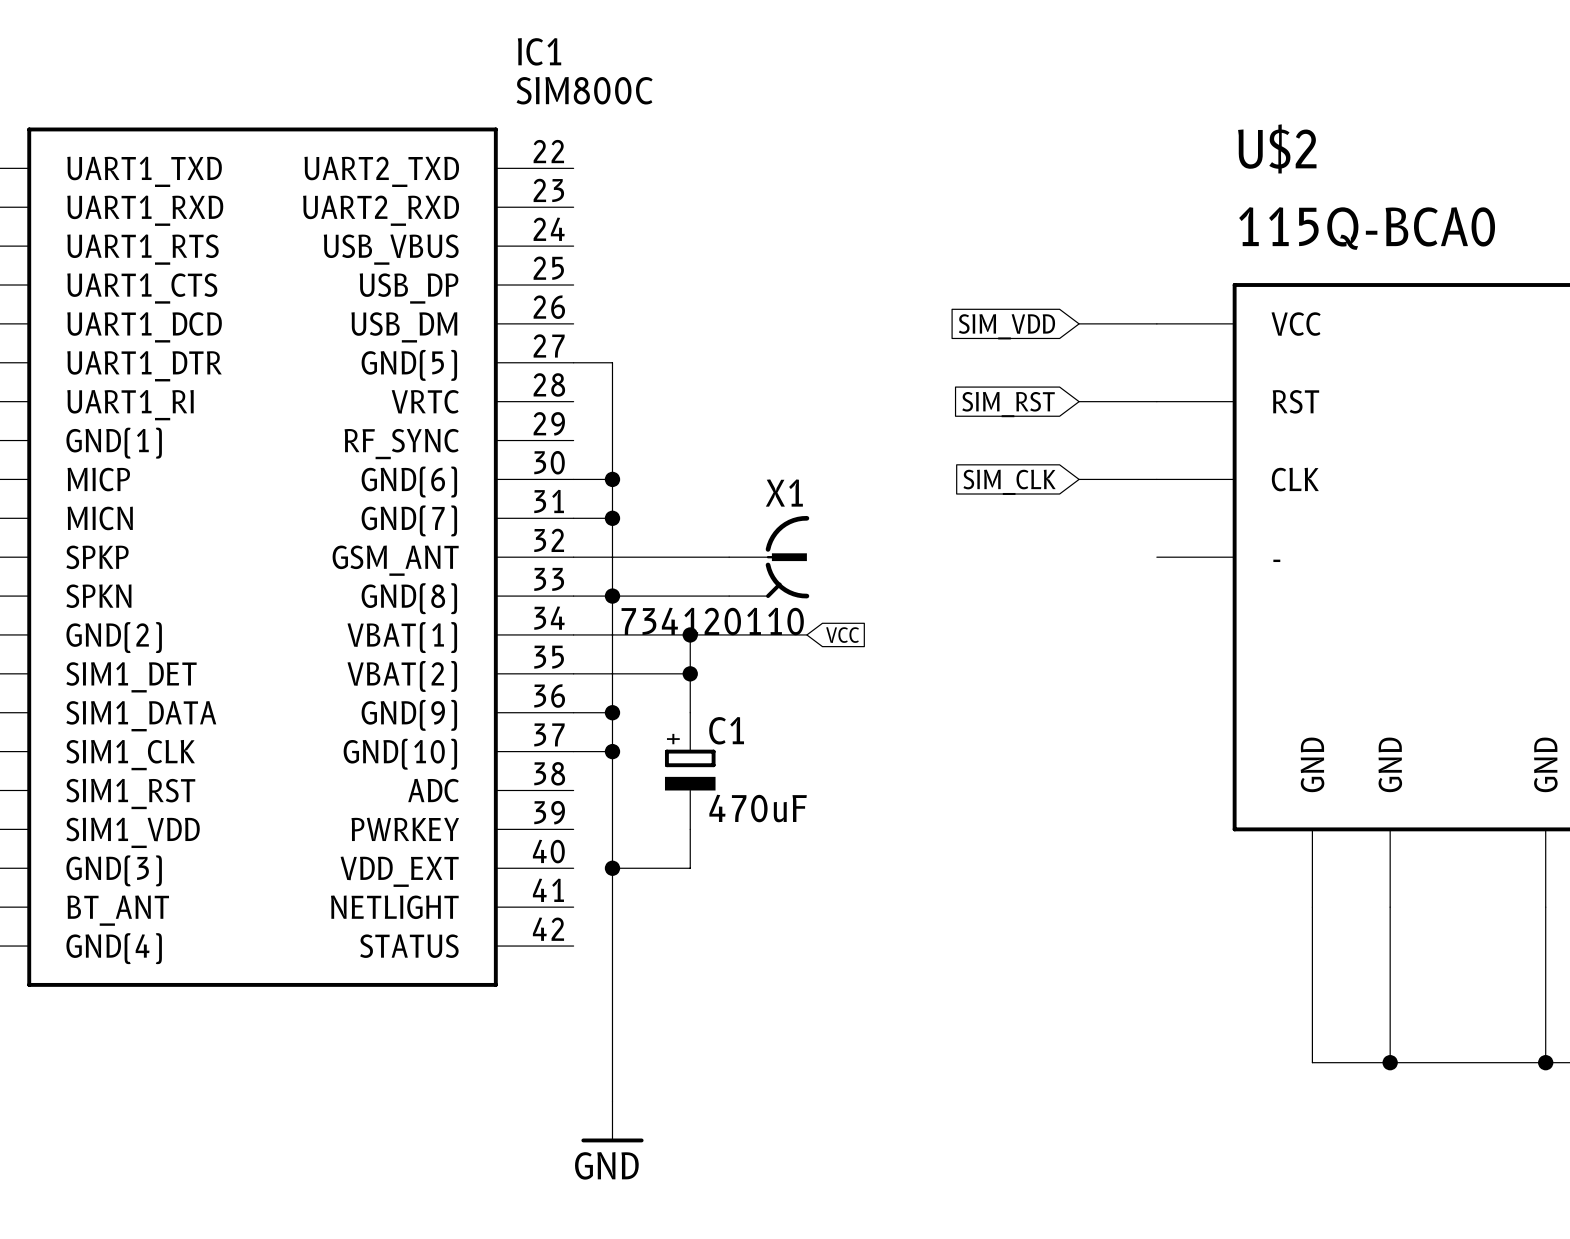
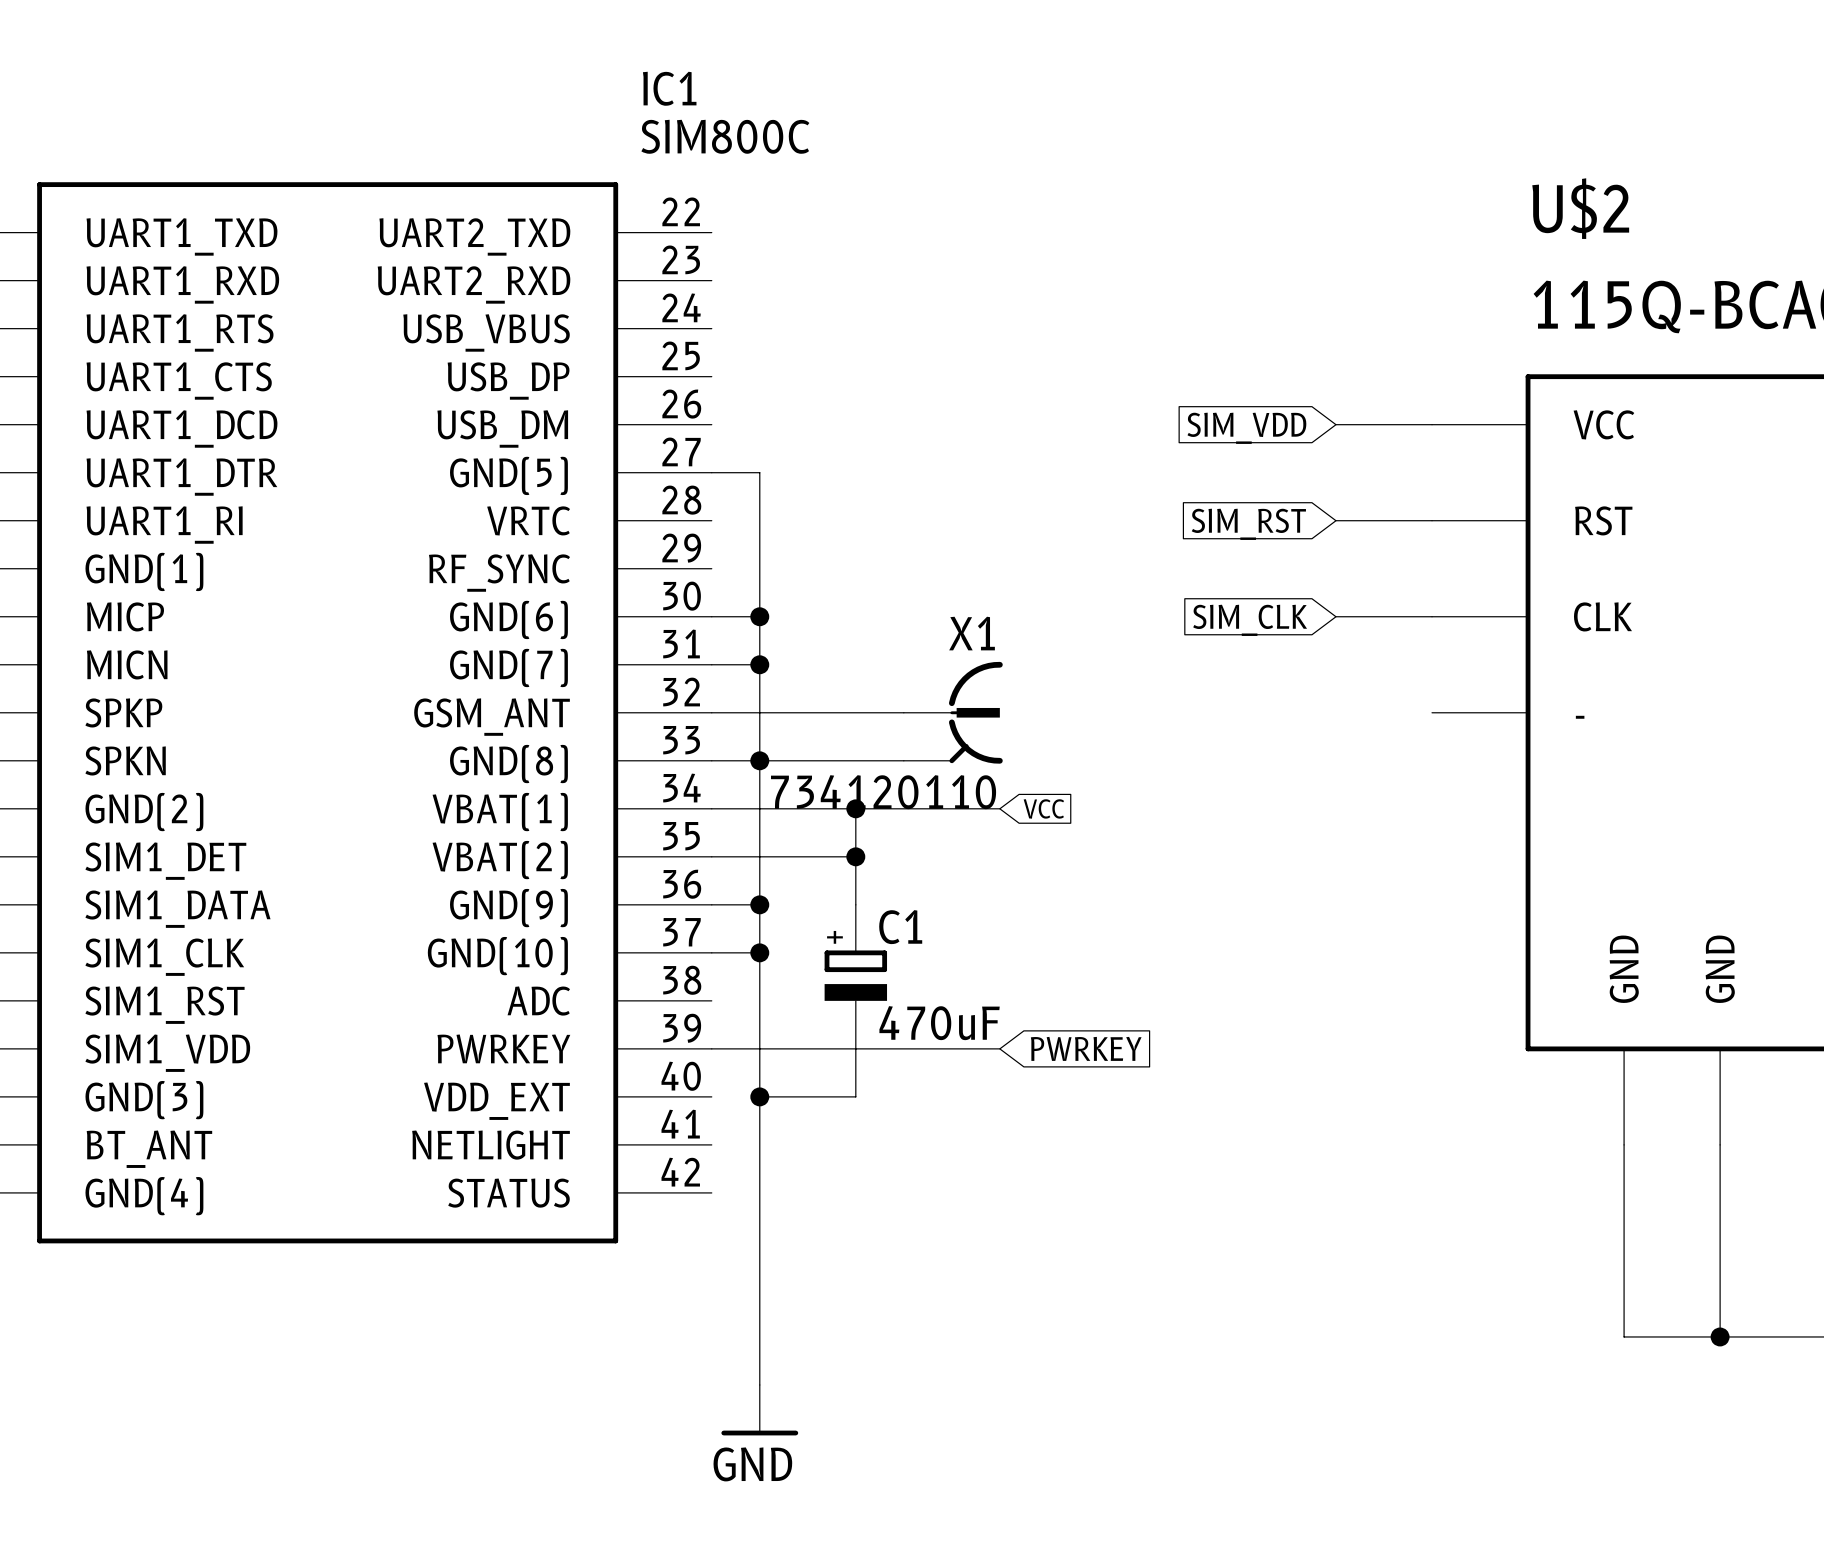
wire: none -> (711, 1048) (999, 1048)
global label: none -> PWRKEY (1086, 1048)

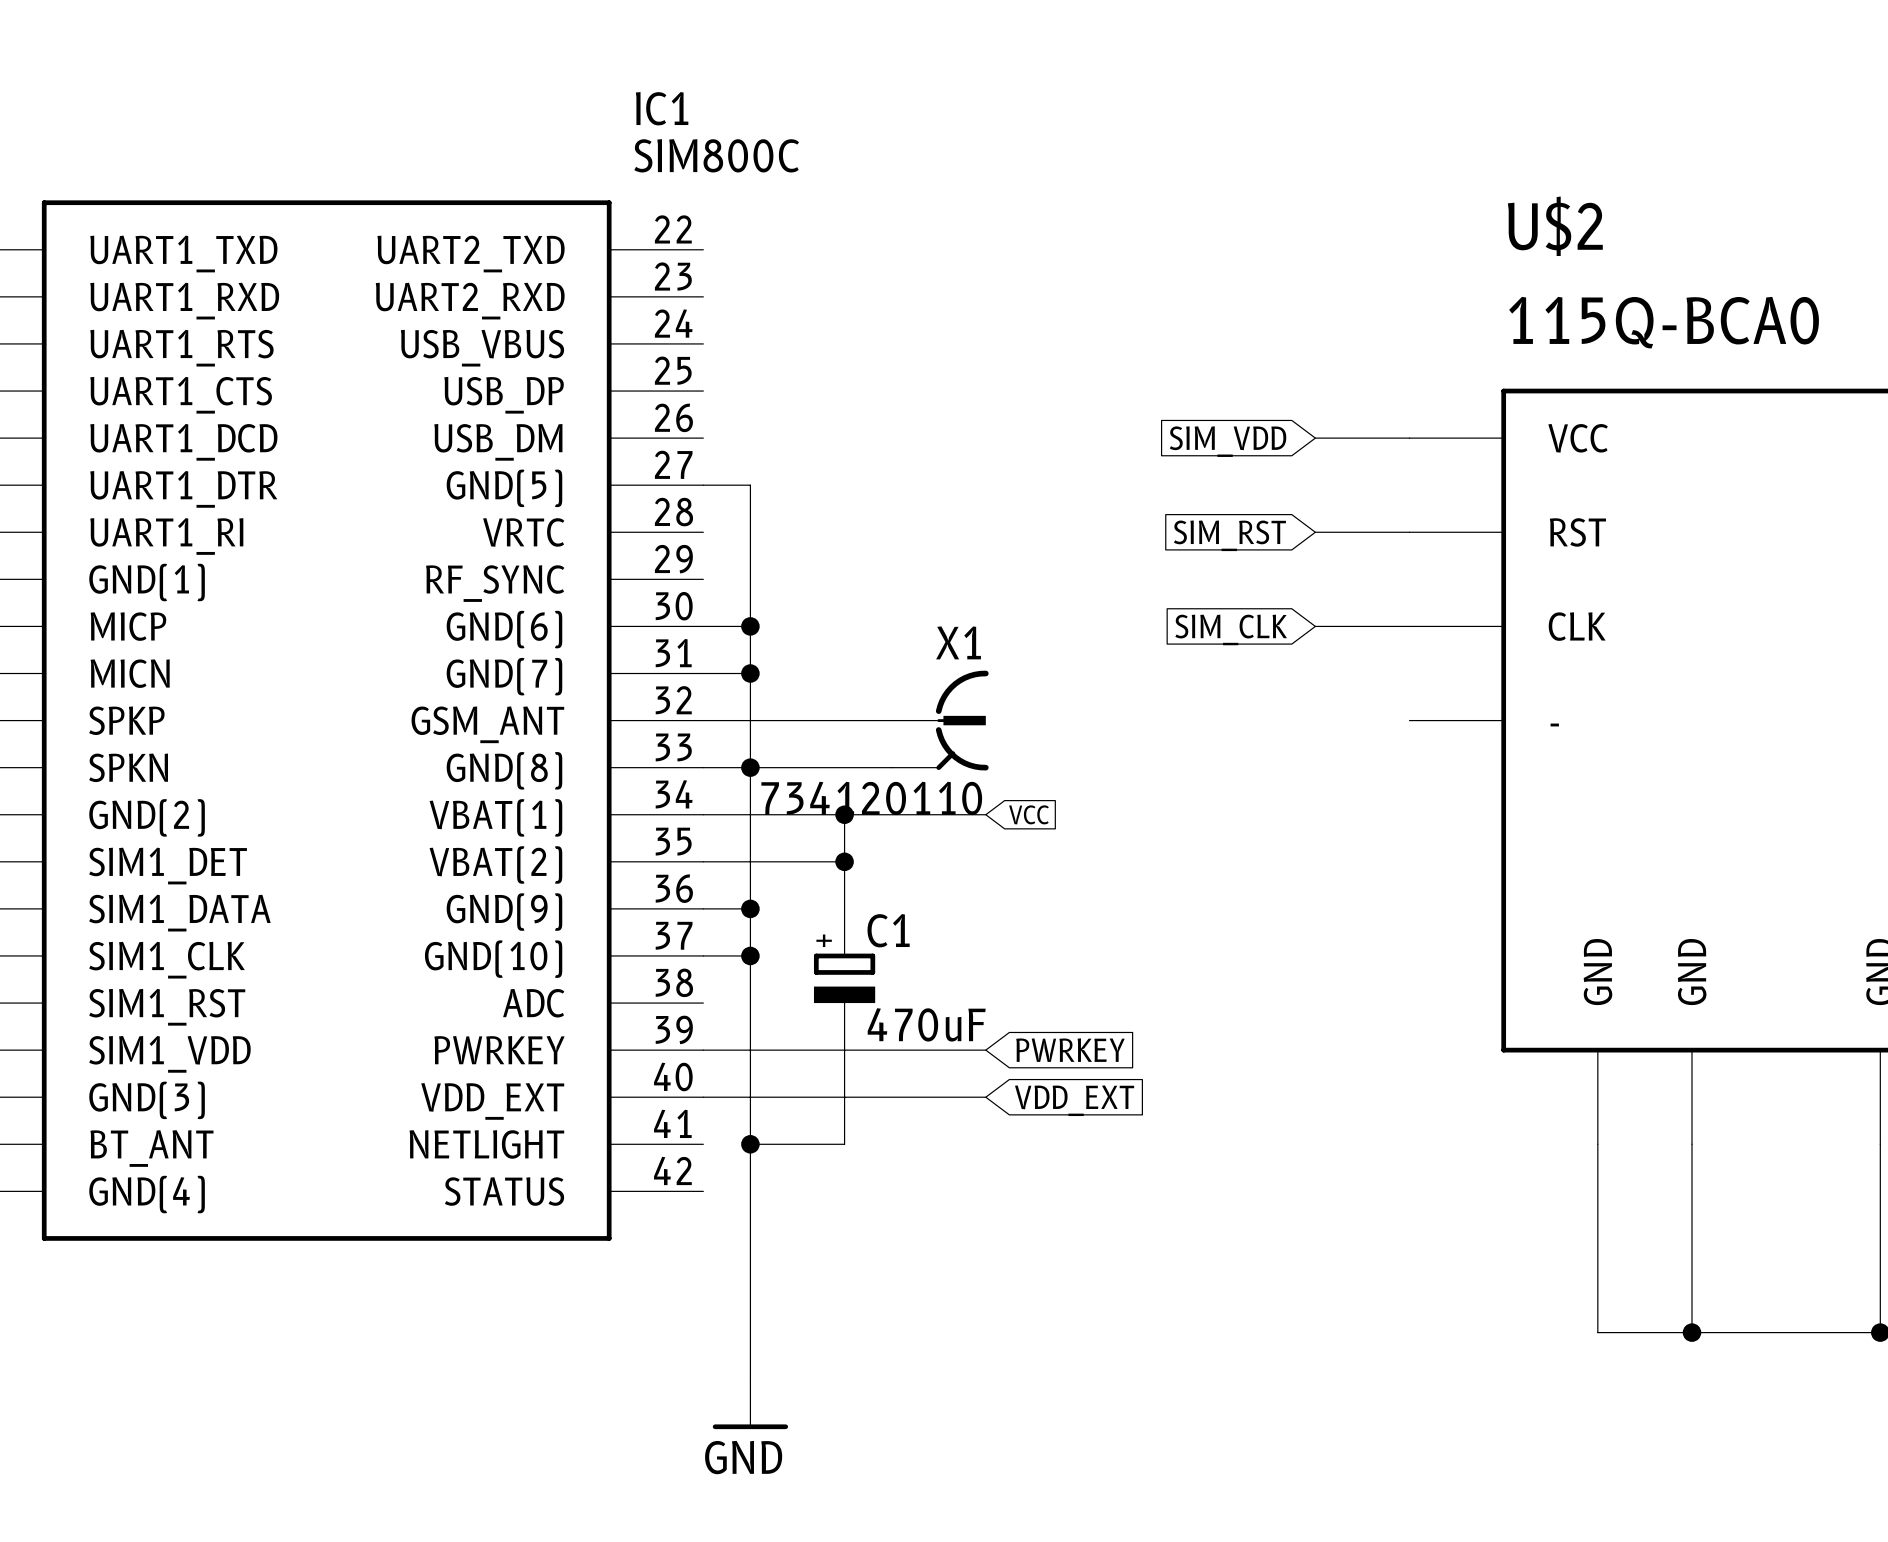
wire: none -> (703, 1097) (750, 1097)
junction position: (759, 1096) -> (750, 1144)
wire: none -> (985, 1097) (844, 1097) (844, 1144) (750, 1144)
global label: none -> VDD_EXT (1074, 1100)

